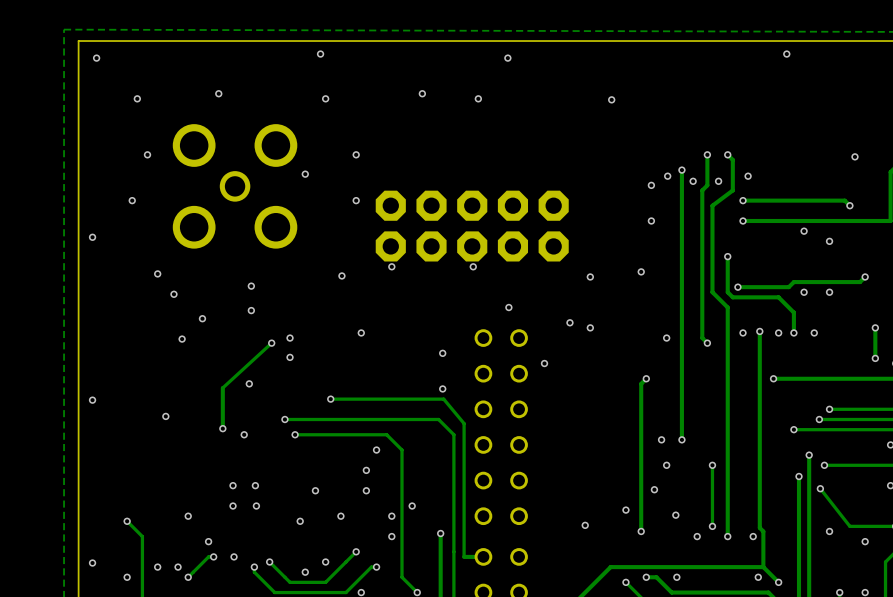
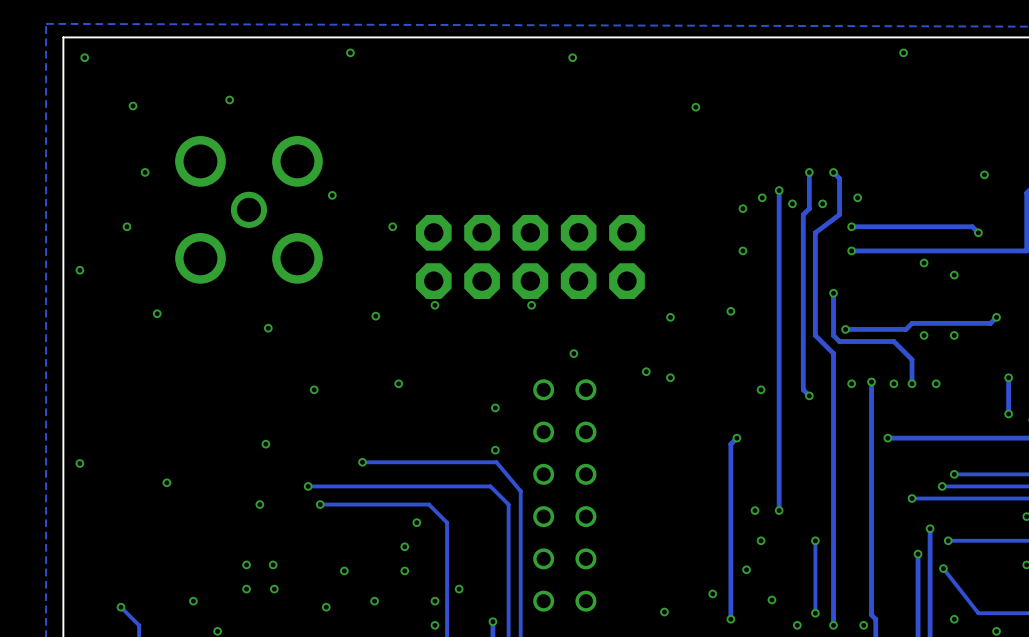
via: (422, 93) -> none
via: (325, 98) -> none
via: (478, 98) -> none
via: (356, 154) -> none
via: (173, 294) -> none
via: (251, 310) -> none
via: (202, 318) -> none
via: (182, 339) -> none
track: (271, 343) (222, 387) (222, 428) -> none
via: (271, 343) -> none
via: (290, 357) -> none
via: (544, 363) -> none
via: (222, 428) -> none

